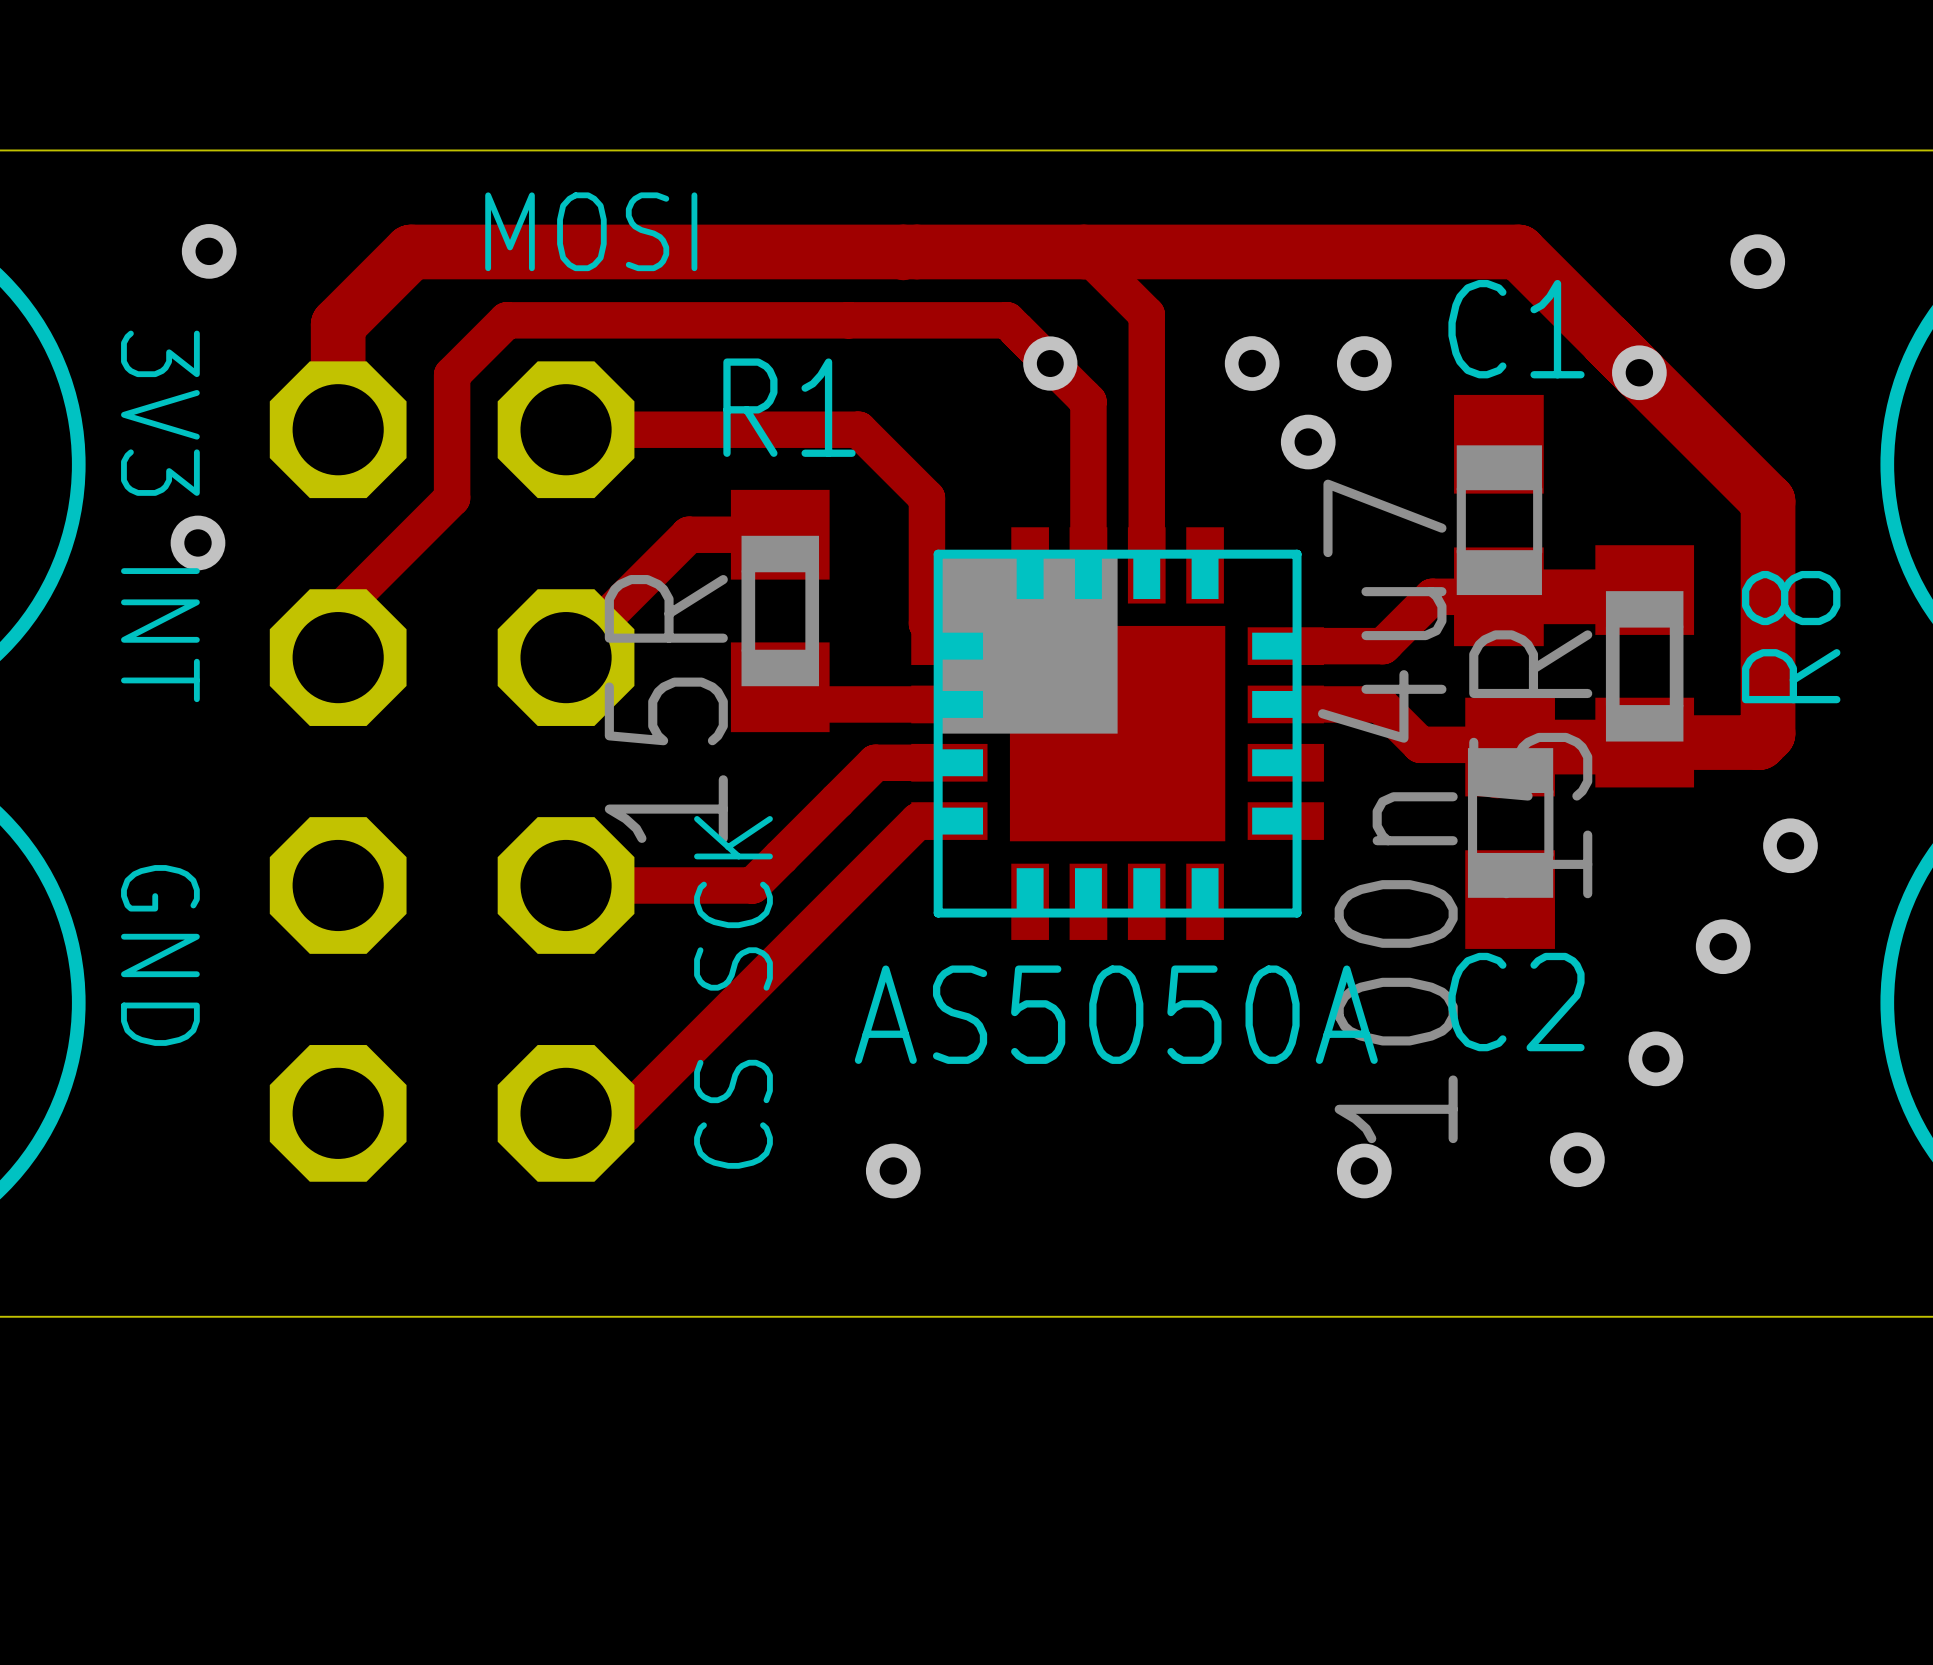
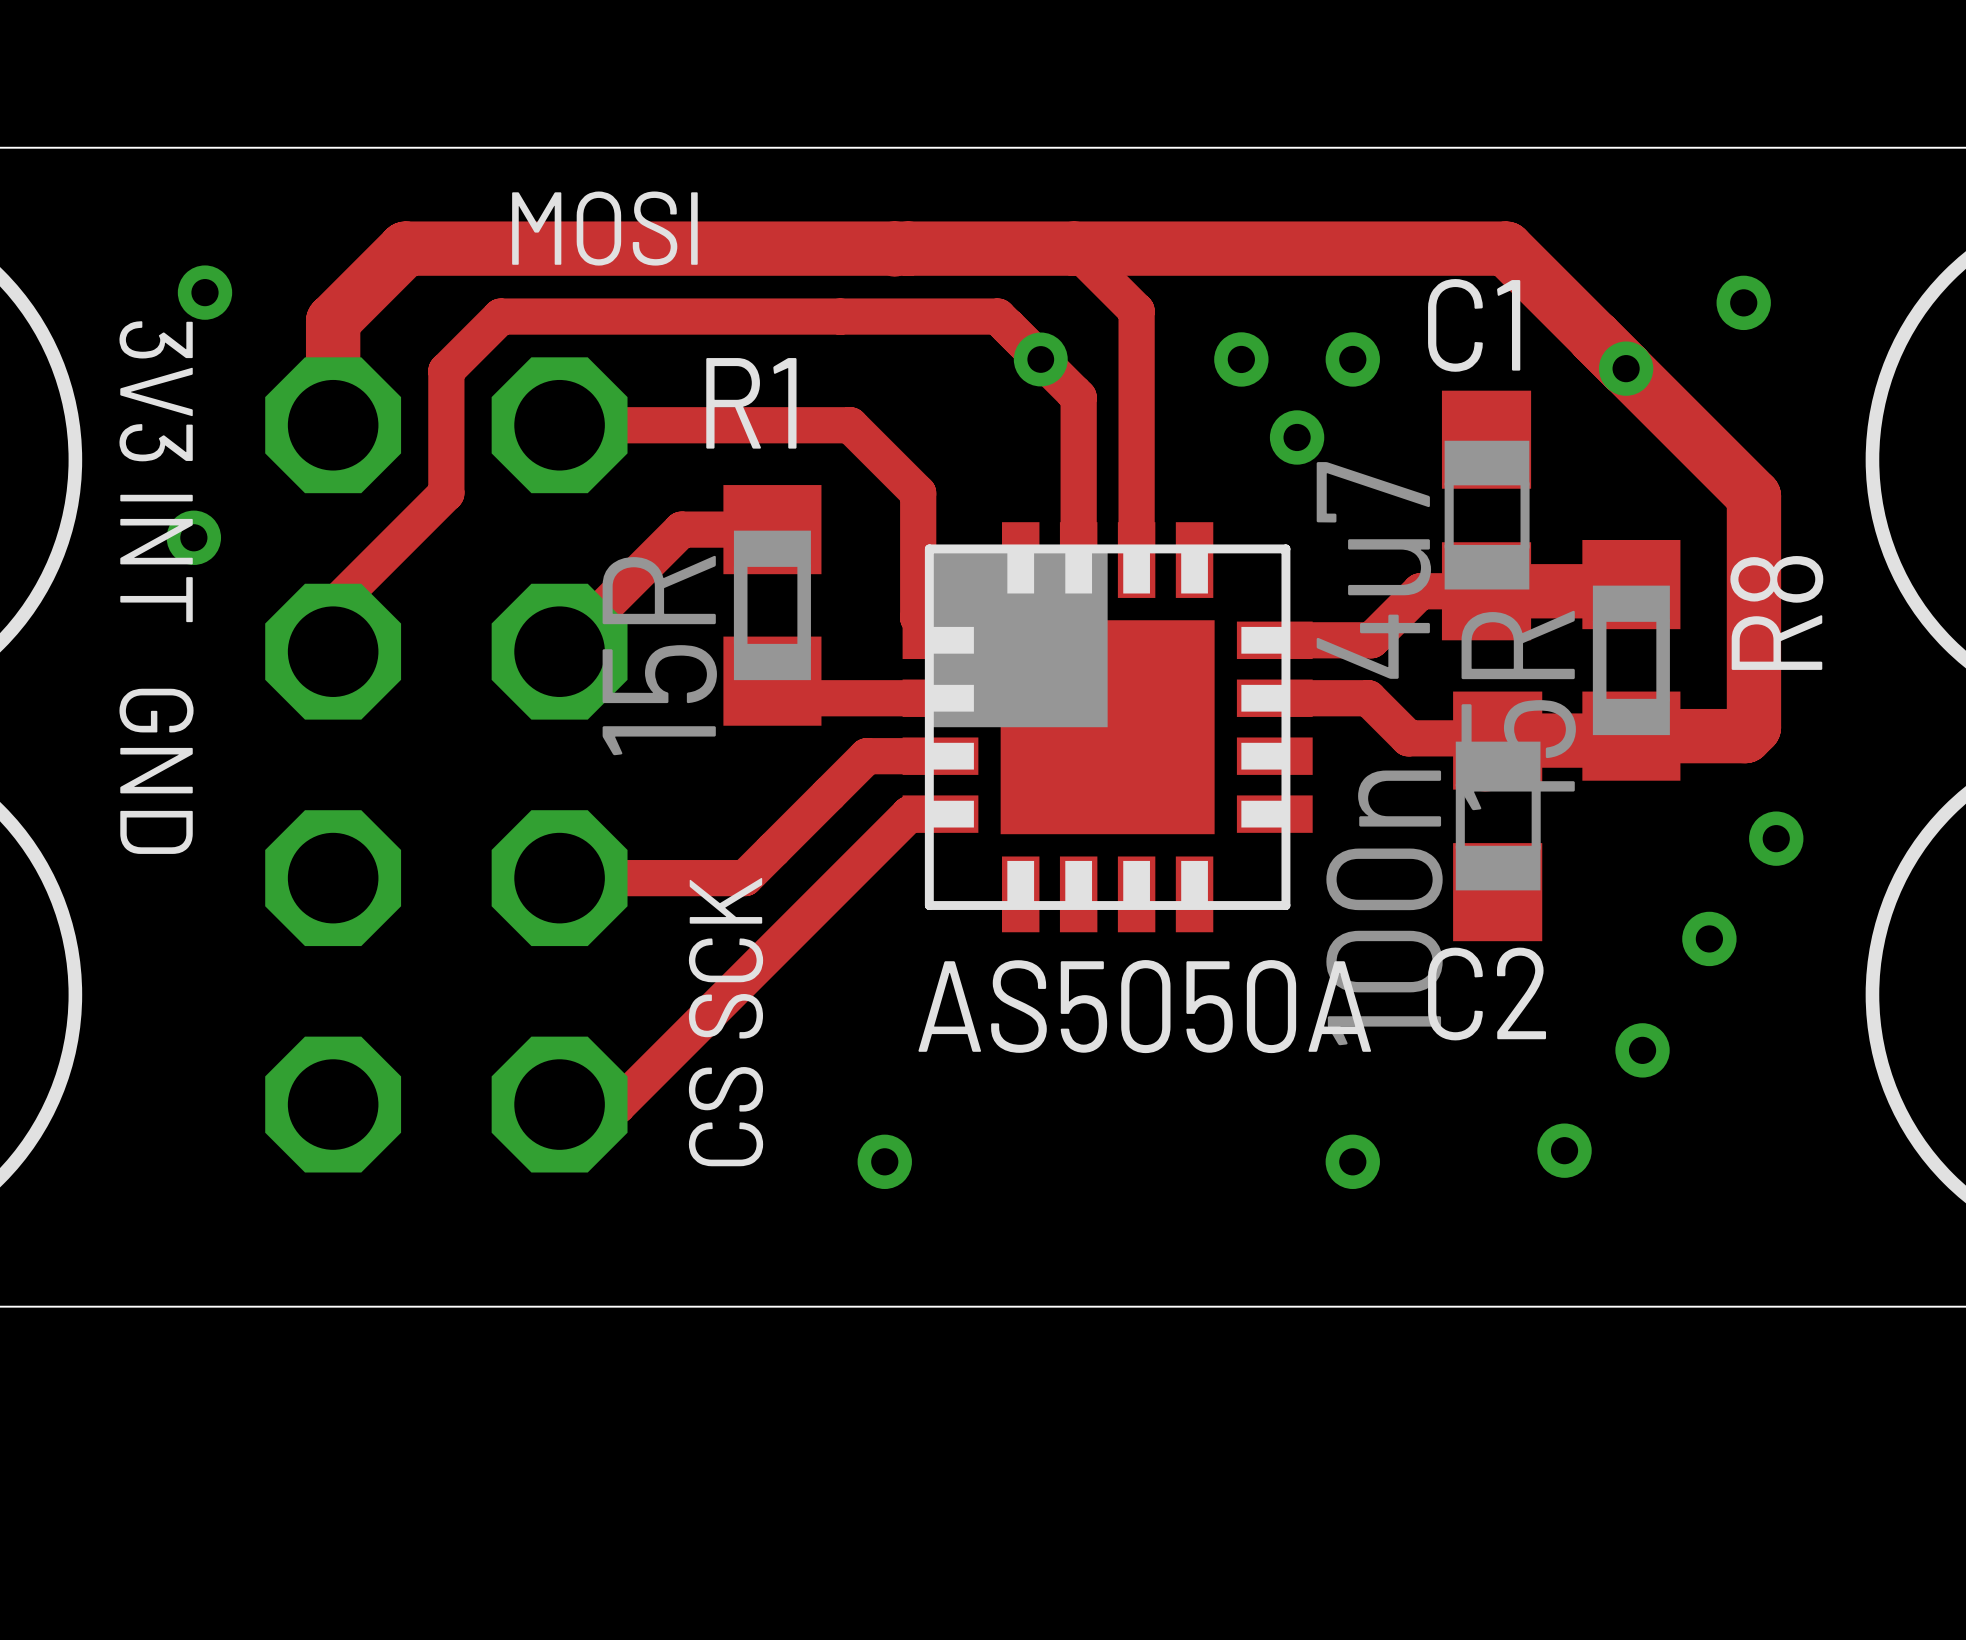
via position: (209, 251) -> (205, 292)
via position: (1757, 261) -> (1743, 302)

